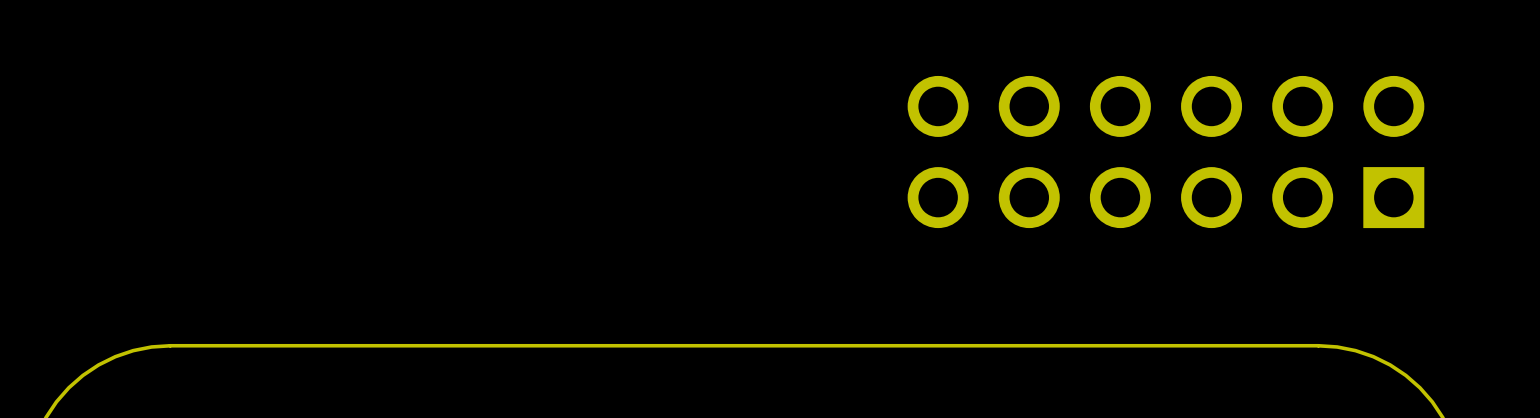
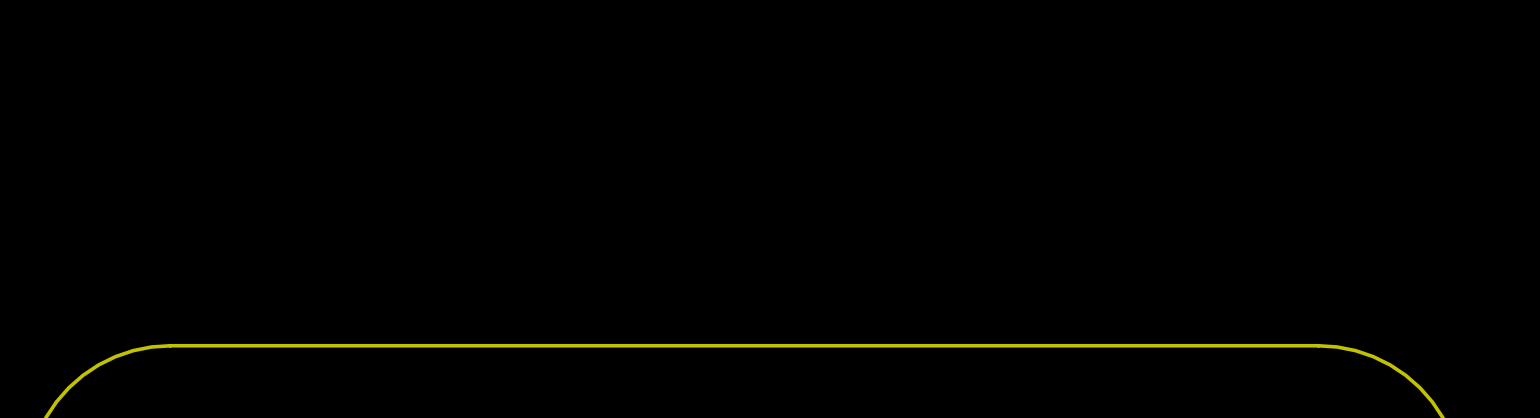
part: (1165, 152) -> none

